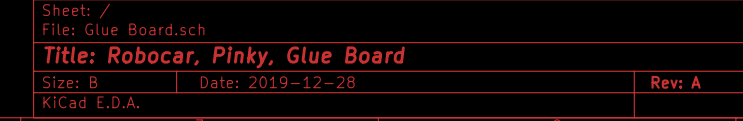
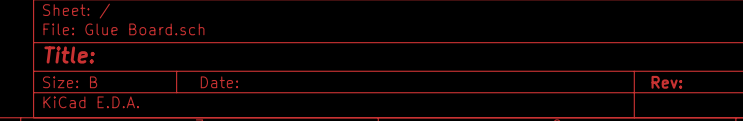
title block: Title: Robocar, Pinky, Glue Board (224, 57) -> Title: (69, 55)
title block: Date: 2019-12-28 (277, 82) -> Date: (219, 82)
title block: Rev: A (676, 82) -> Rev: (666, 82)

